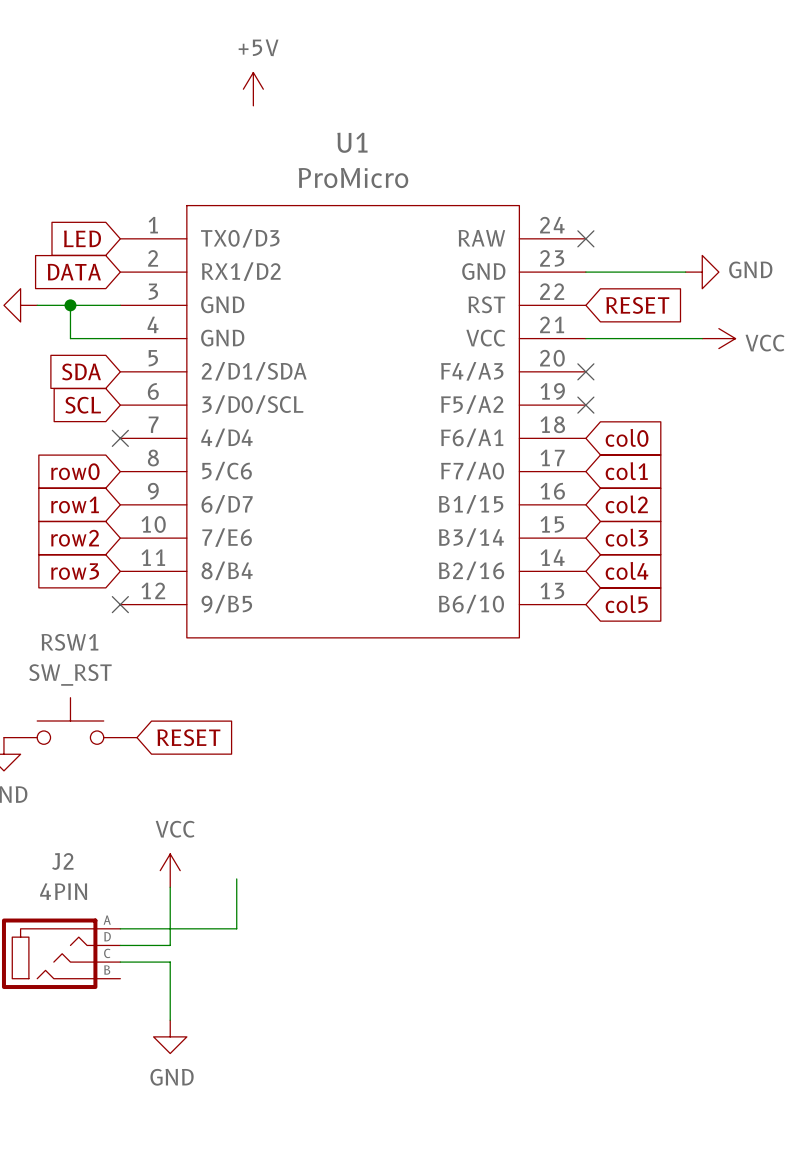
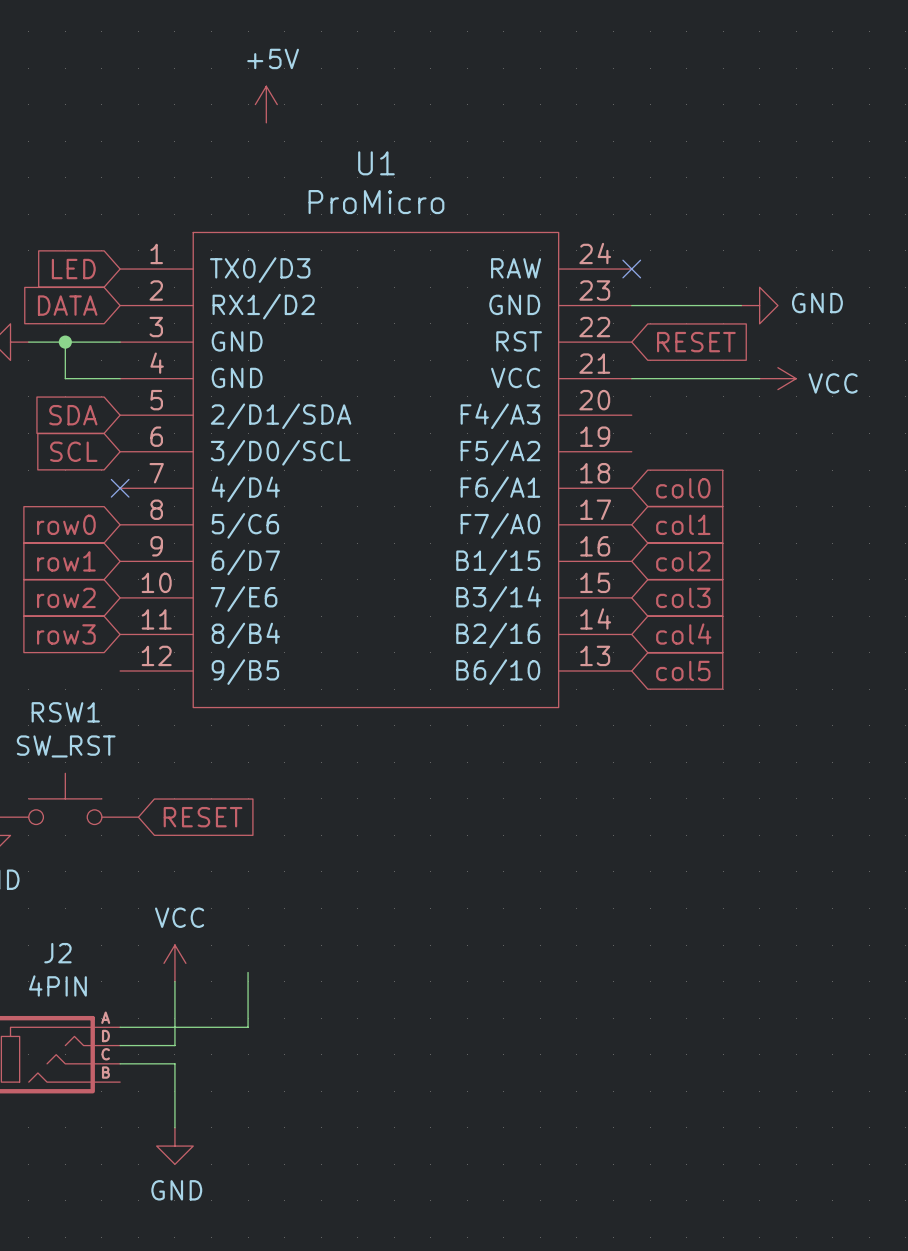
no-connect mark: (585, 371) -> none
no-connect mark: (585, 405) -> none
no-connect mark: (120, 604) -> none

